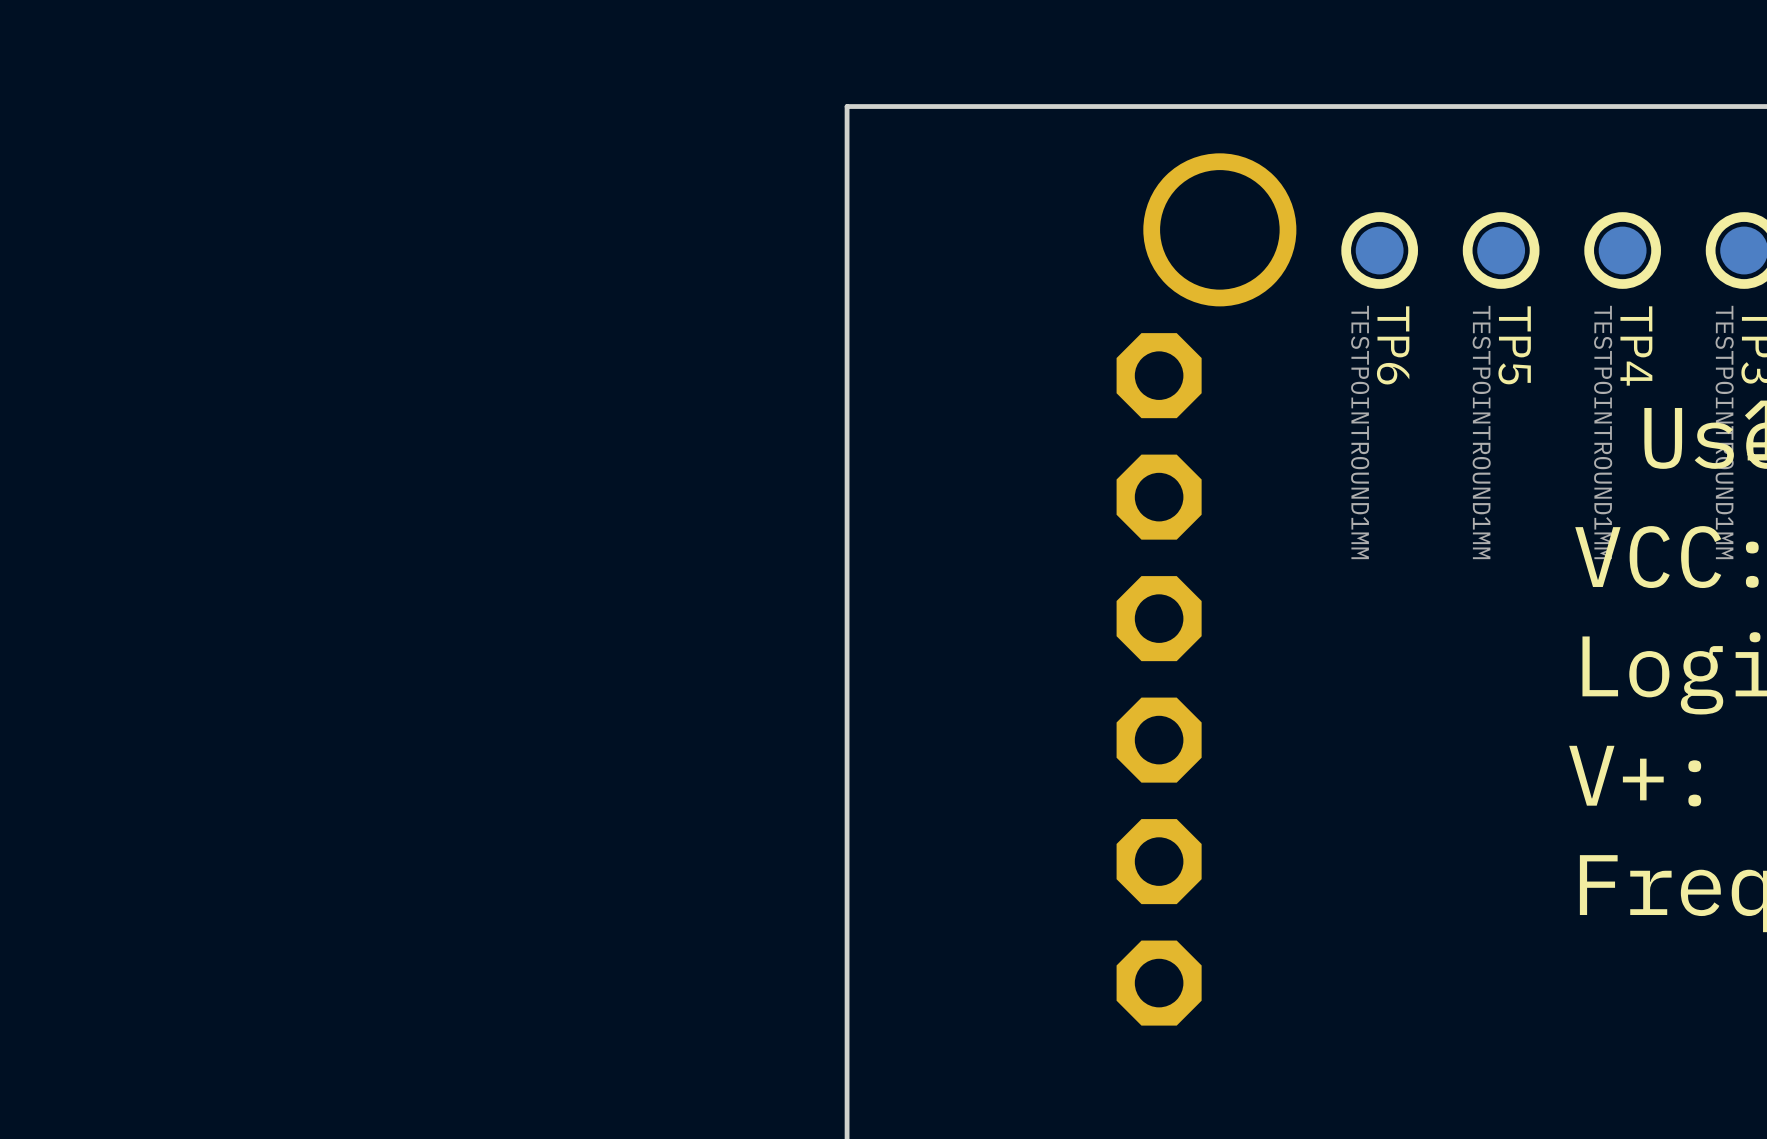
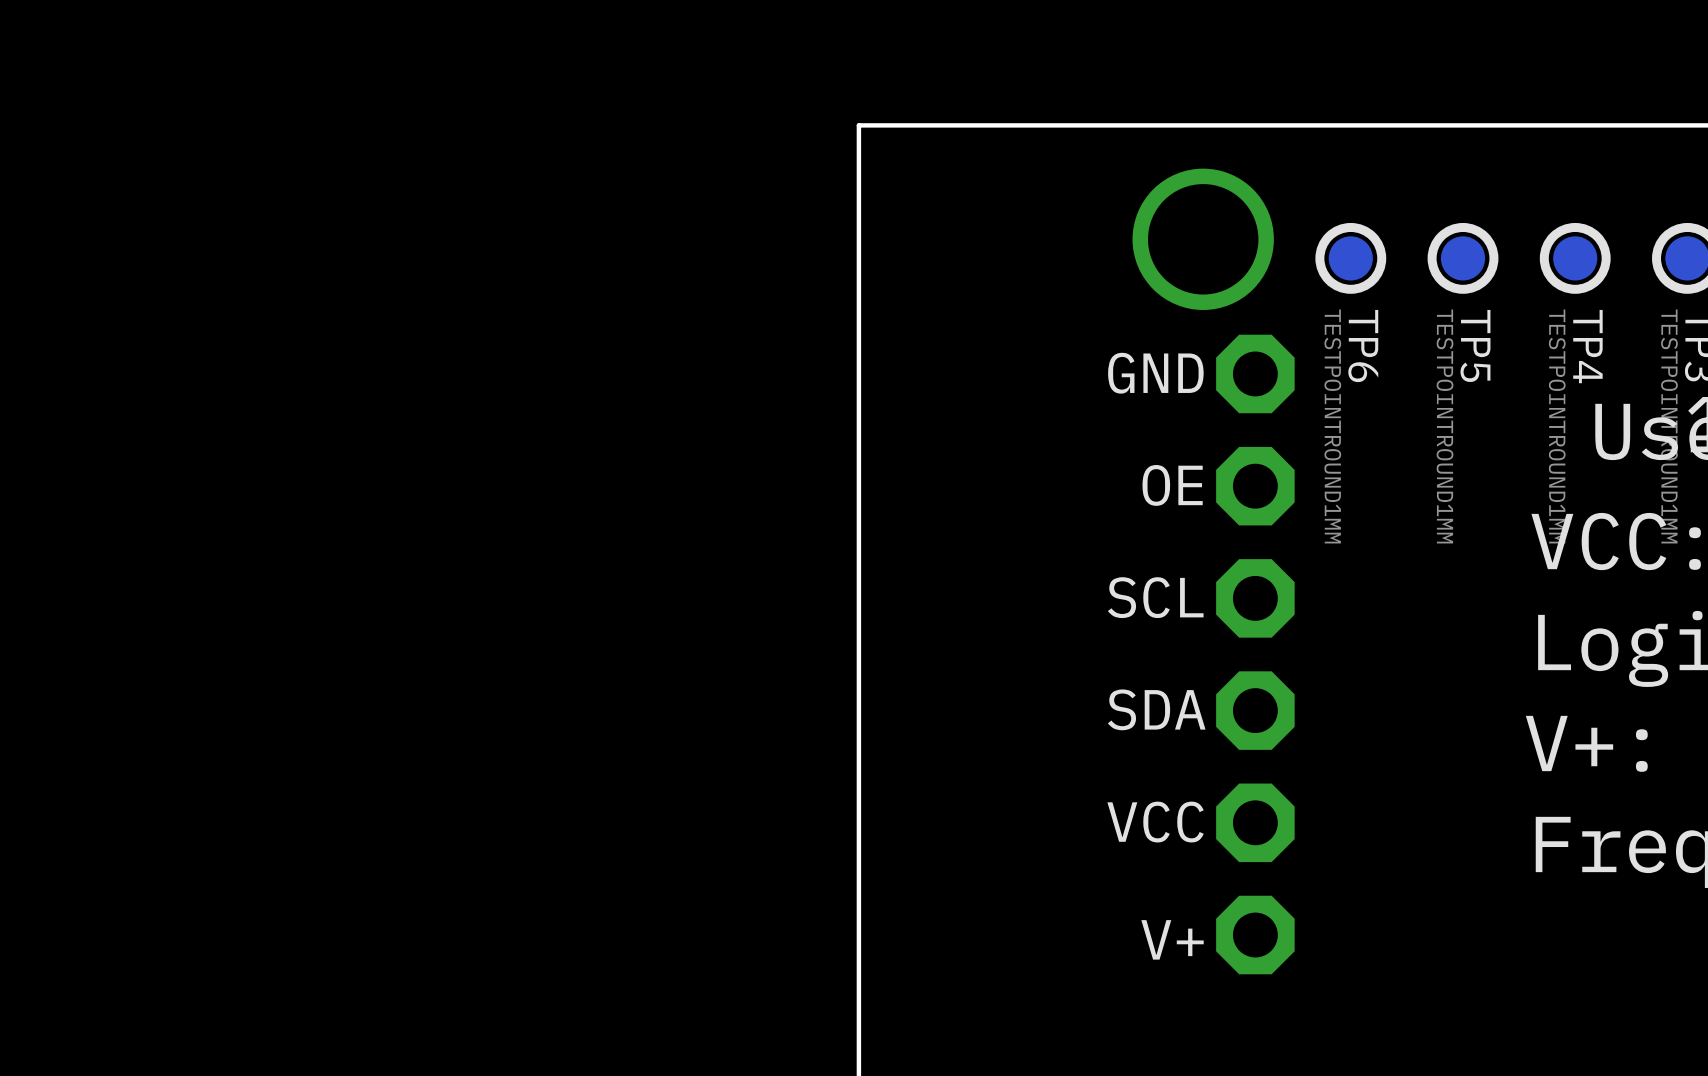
text: none -> GND (1155, 373)
text: none -> OE (1172, 485)
text: none -> SCL (1155, 597)
part position: (1159, 679) -> (1255, 654)
text: none -> SDA (1156, 709)
text: none -> VCC (1155, 822)
text: none -> V+ (1172, 939)

